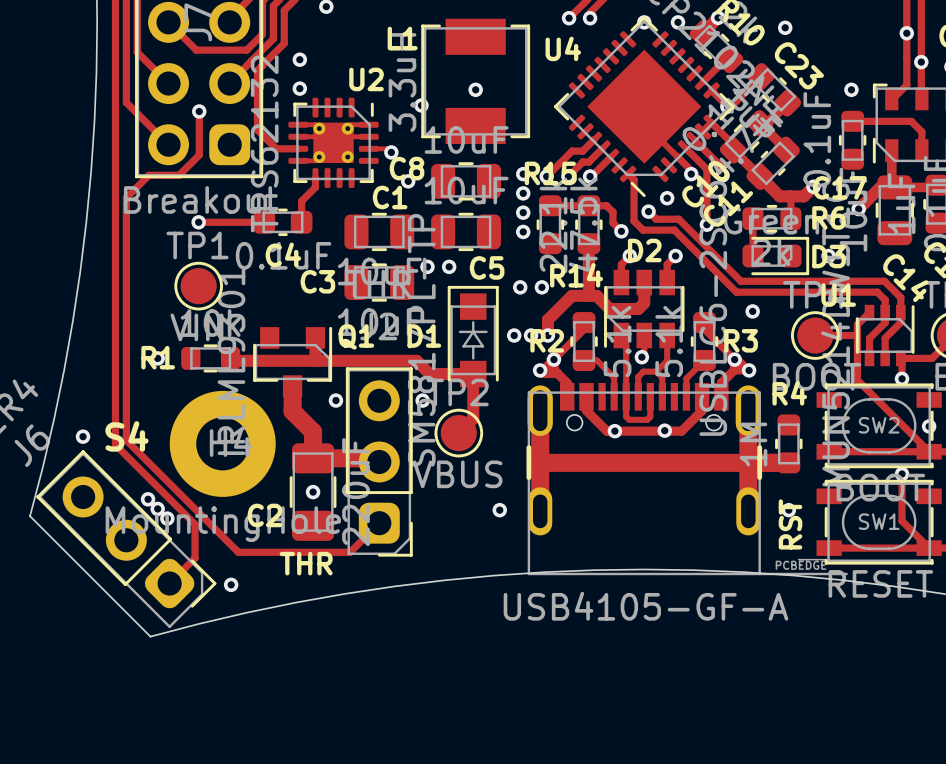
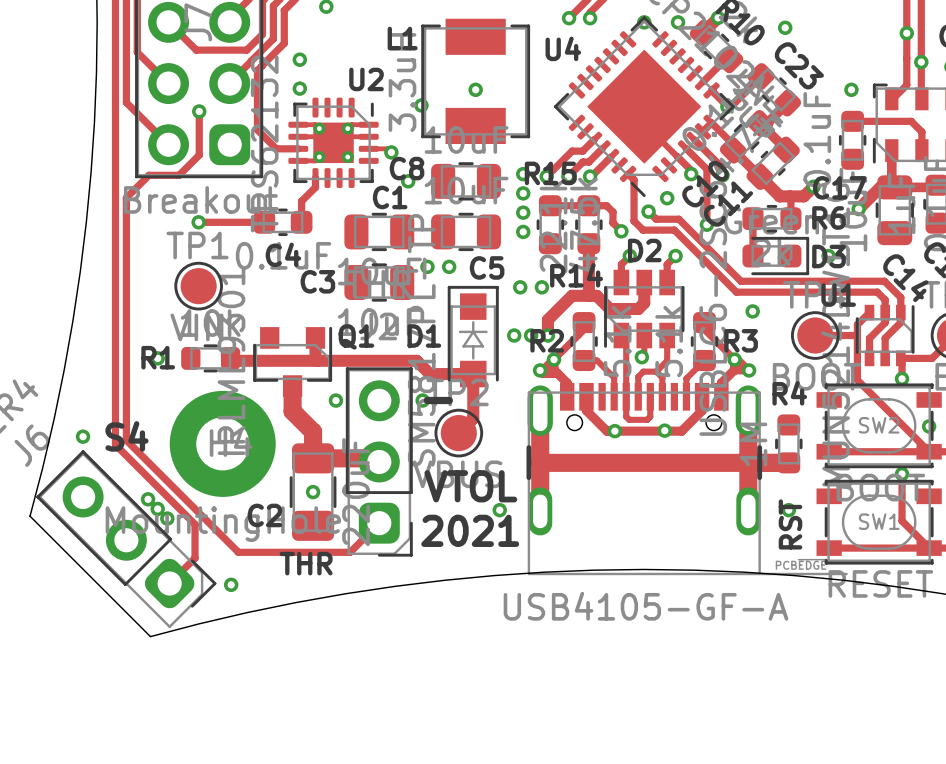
text: none -> - (438, 400)
text: none -> VTOL (470, 486)
text: none -> 2021 (470, 530)

